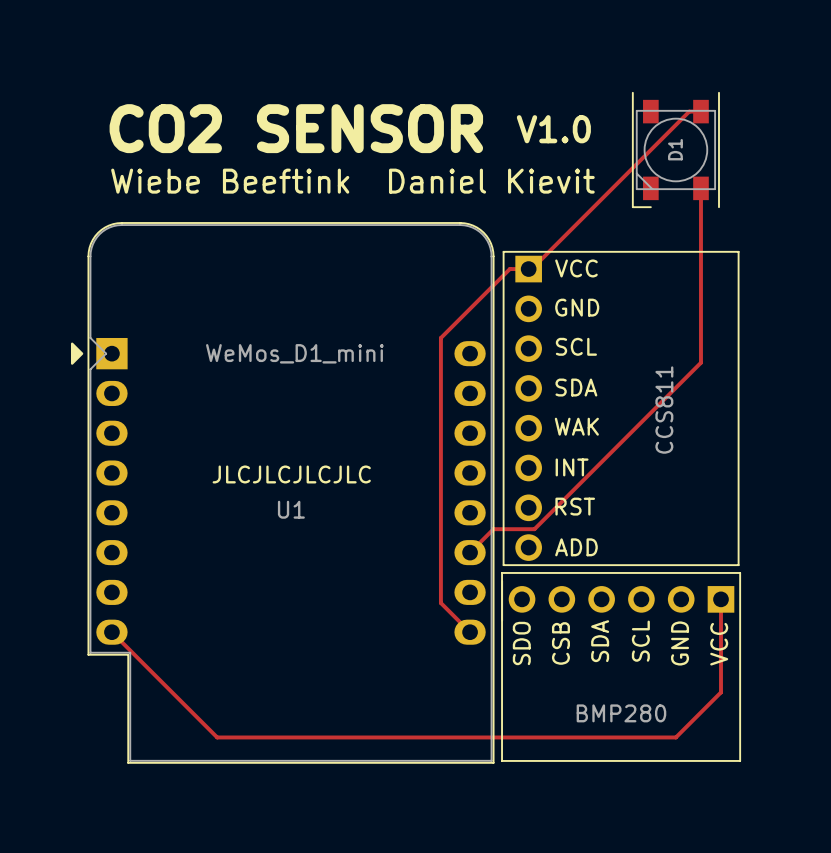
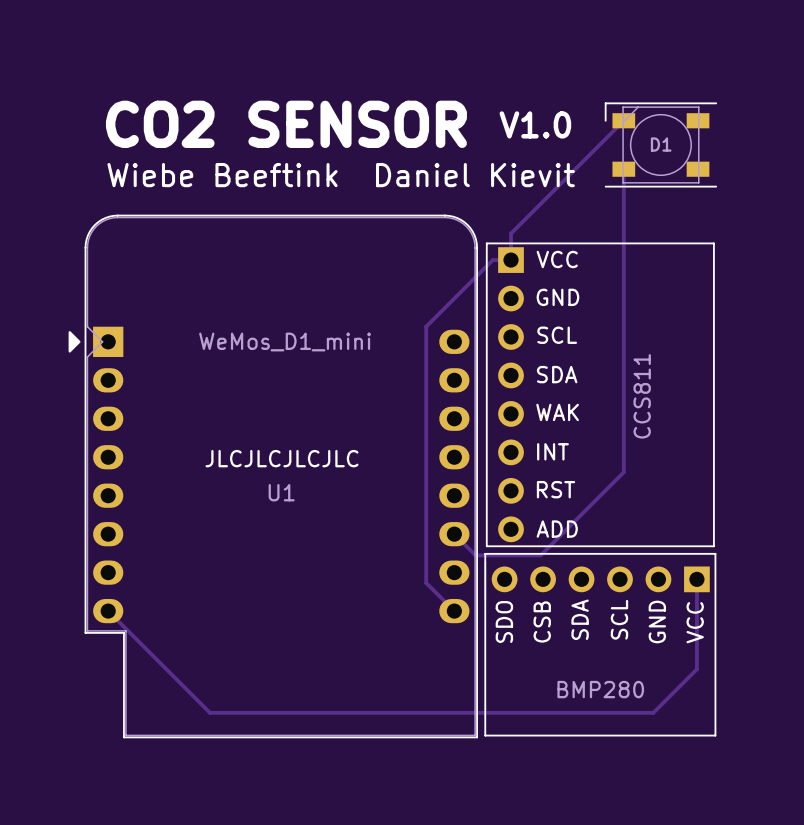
track: (700, 111) (689, 111) (531, 269) (528, 269) -> (623, 120) (511, 233) (511, 260)
D1 rotation: 0° (675, 149) -> 90° clockwise (660, 144)
track: (700, 188) (700, 362) (534, 529) (493, 529) (470, 552) -> (623, 169) (623, 472) (540, 555) (475, 555) (454, 534)

